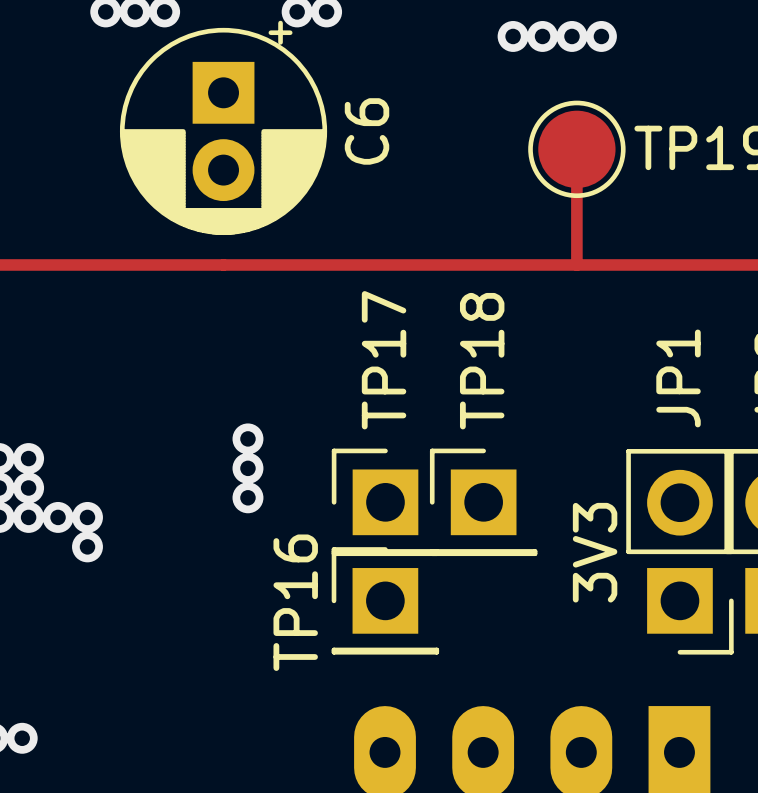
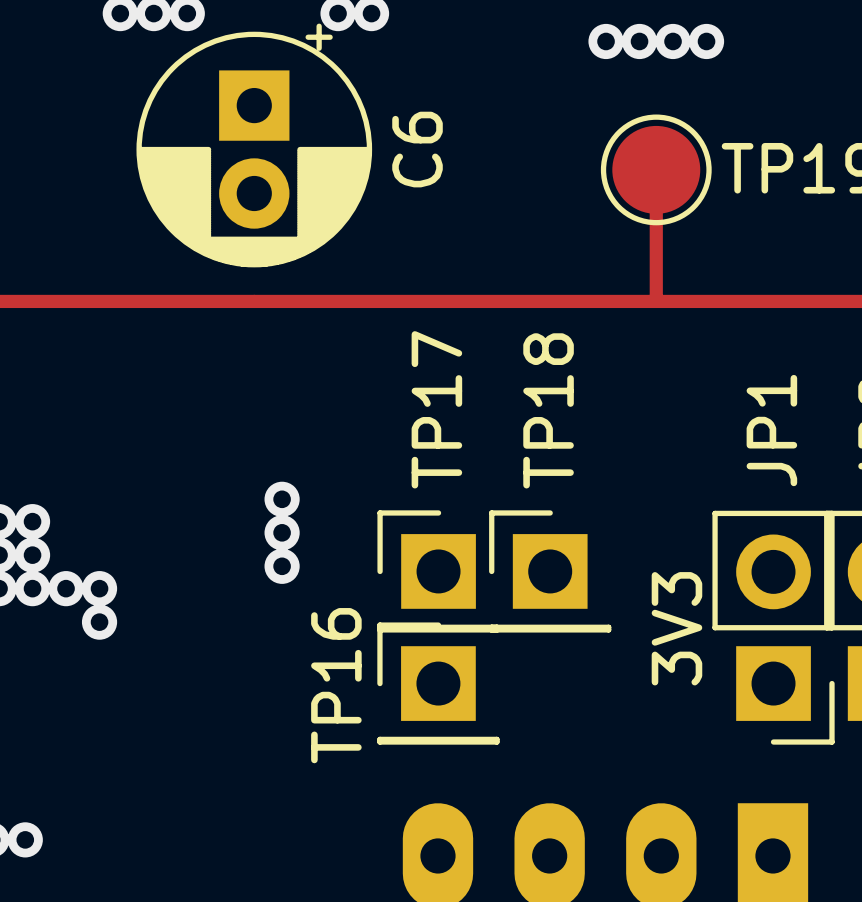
via: (513, 36) -> none
via: none -> (606, 41)
via: (542, 36) -> none
via: none -> (639, 41)
via: (571, 36) -> none
via: none -> (673, 41)
via: (601, 36) -> none
via: none -> (706, 41)

